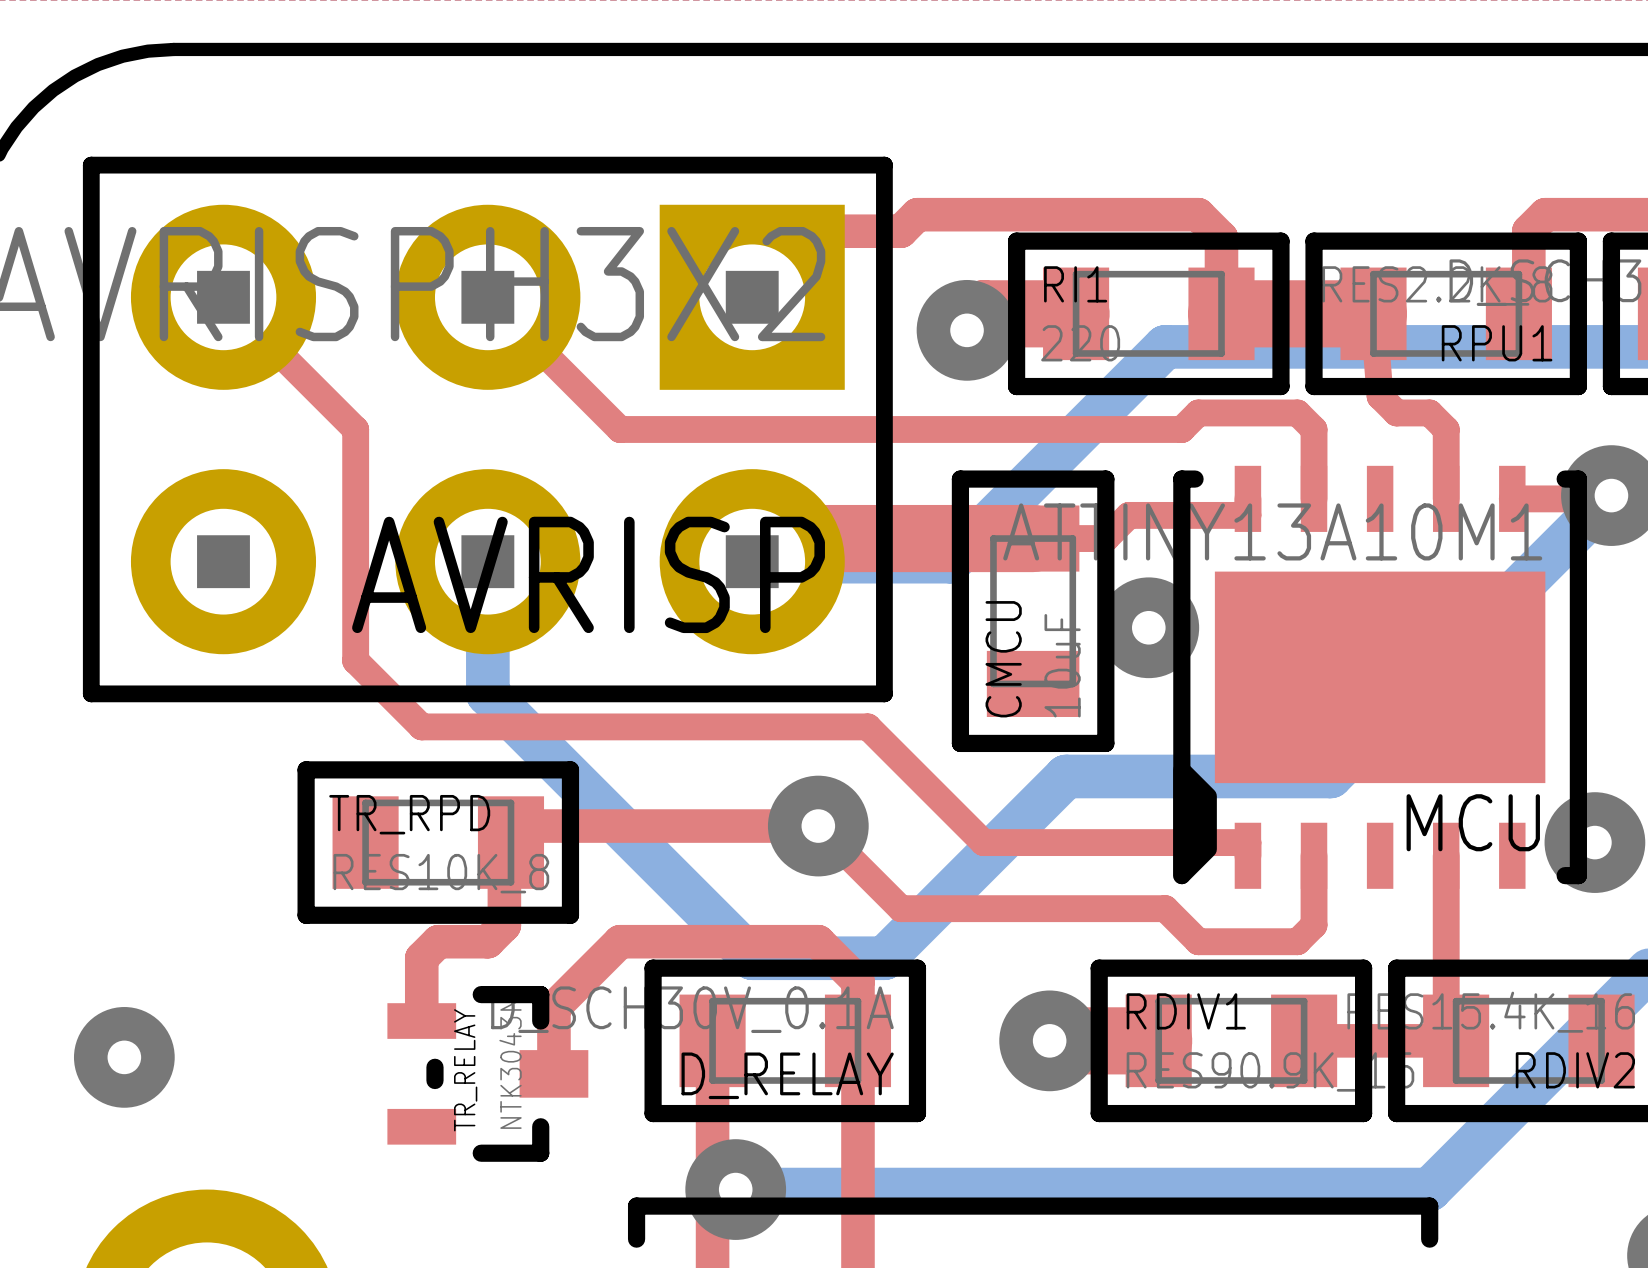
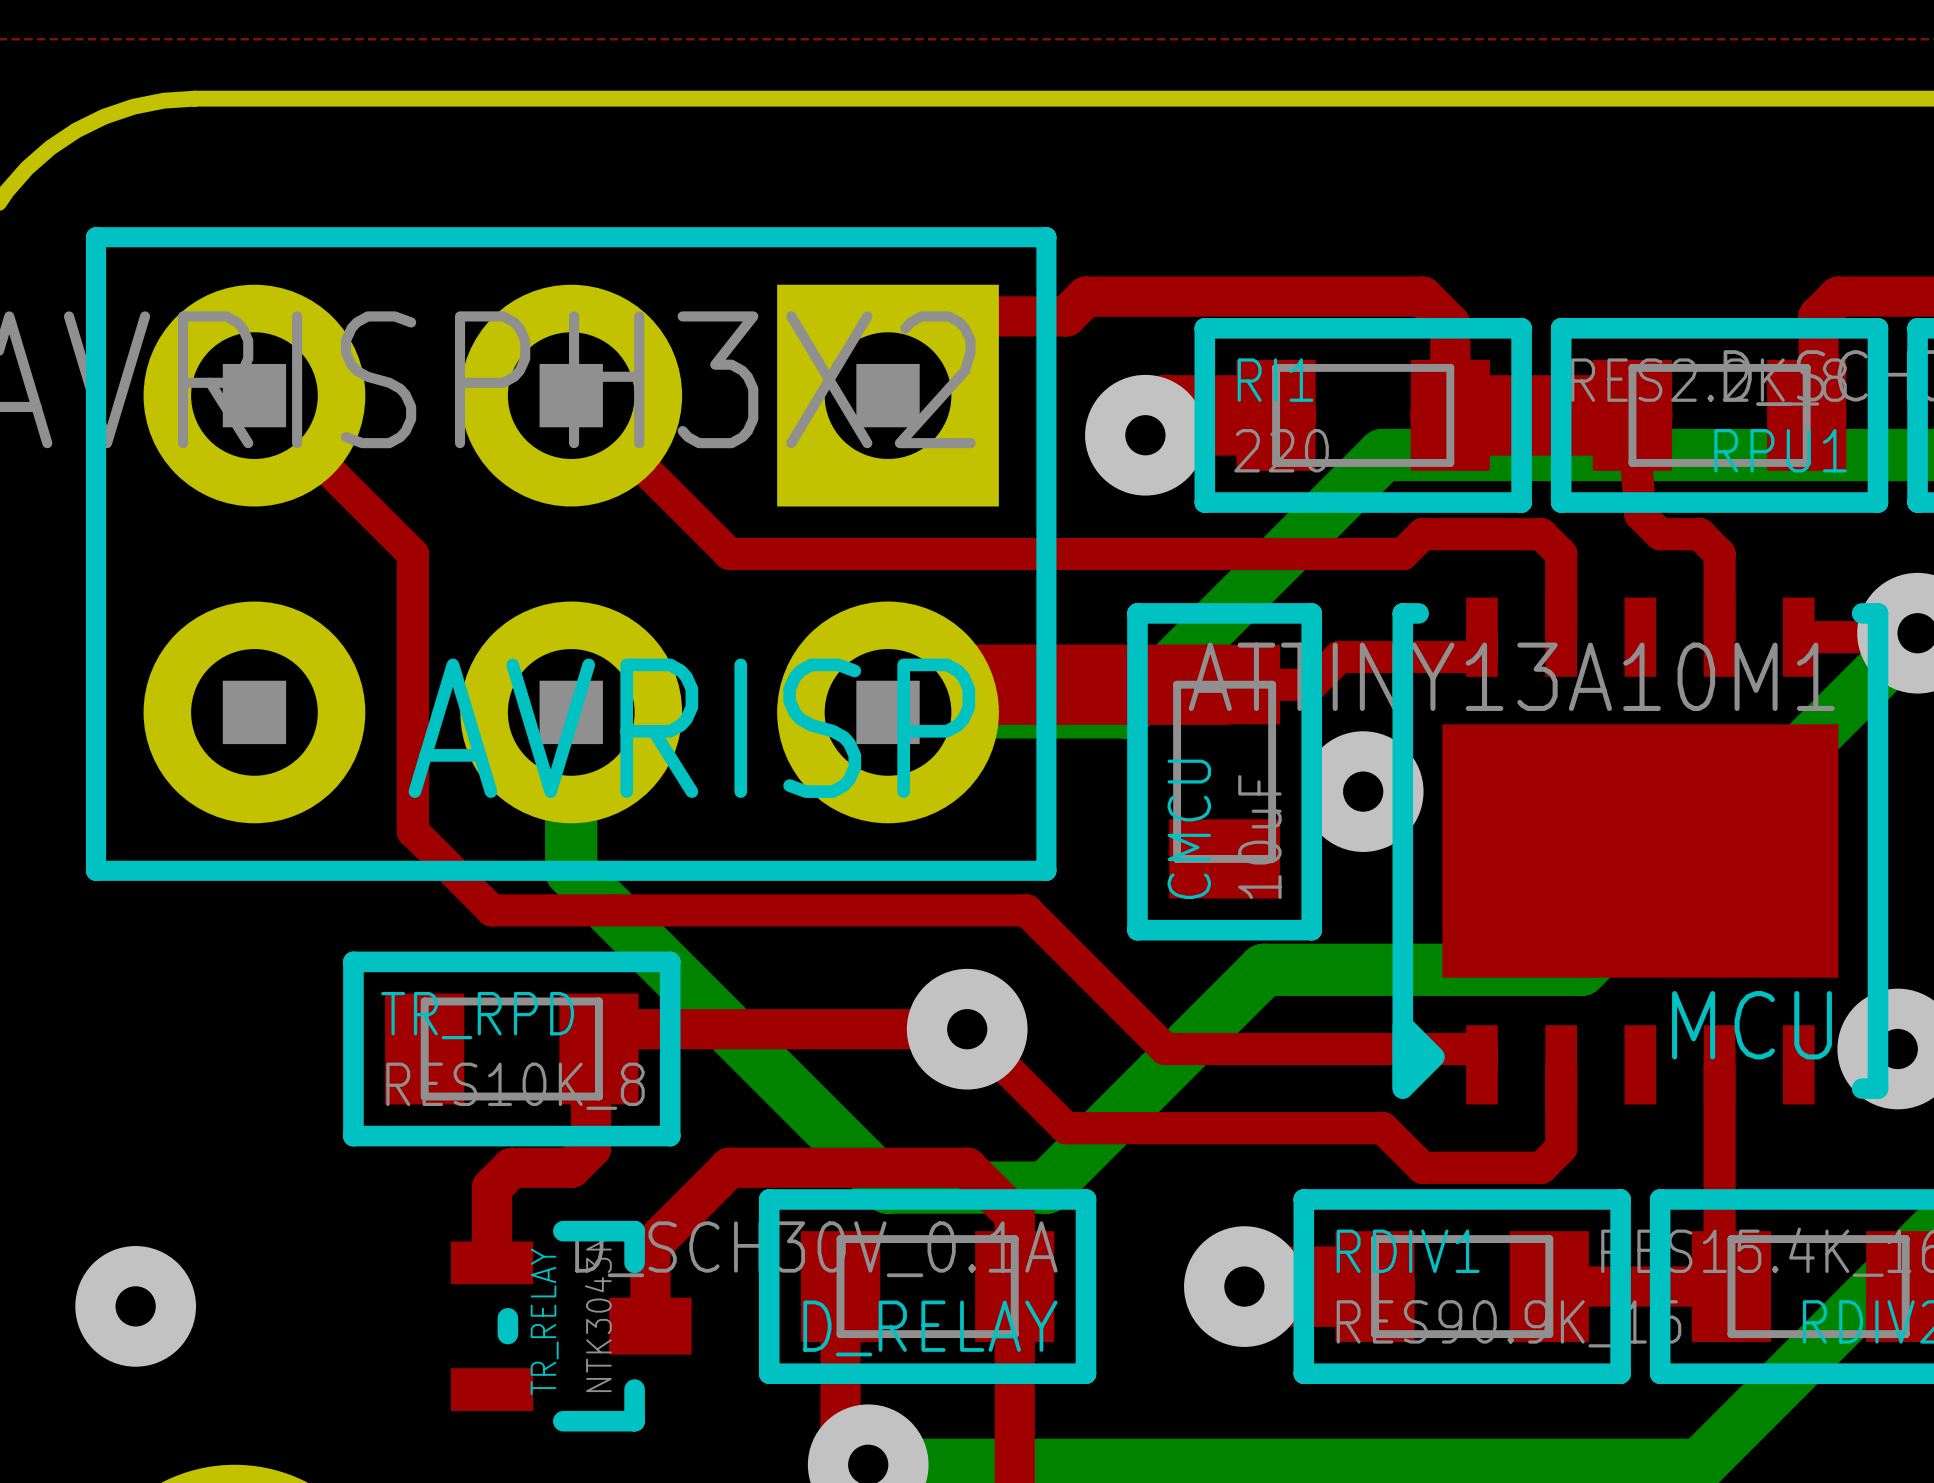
MCU footprint: [1173, 465, 1587, 889] -> [1392, 597, 1889, 1105]

